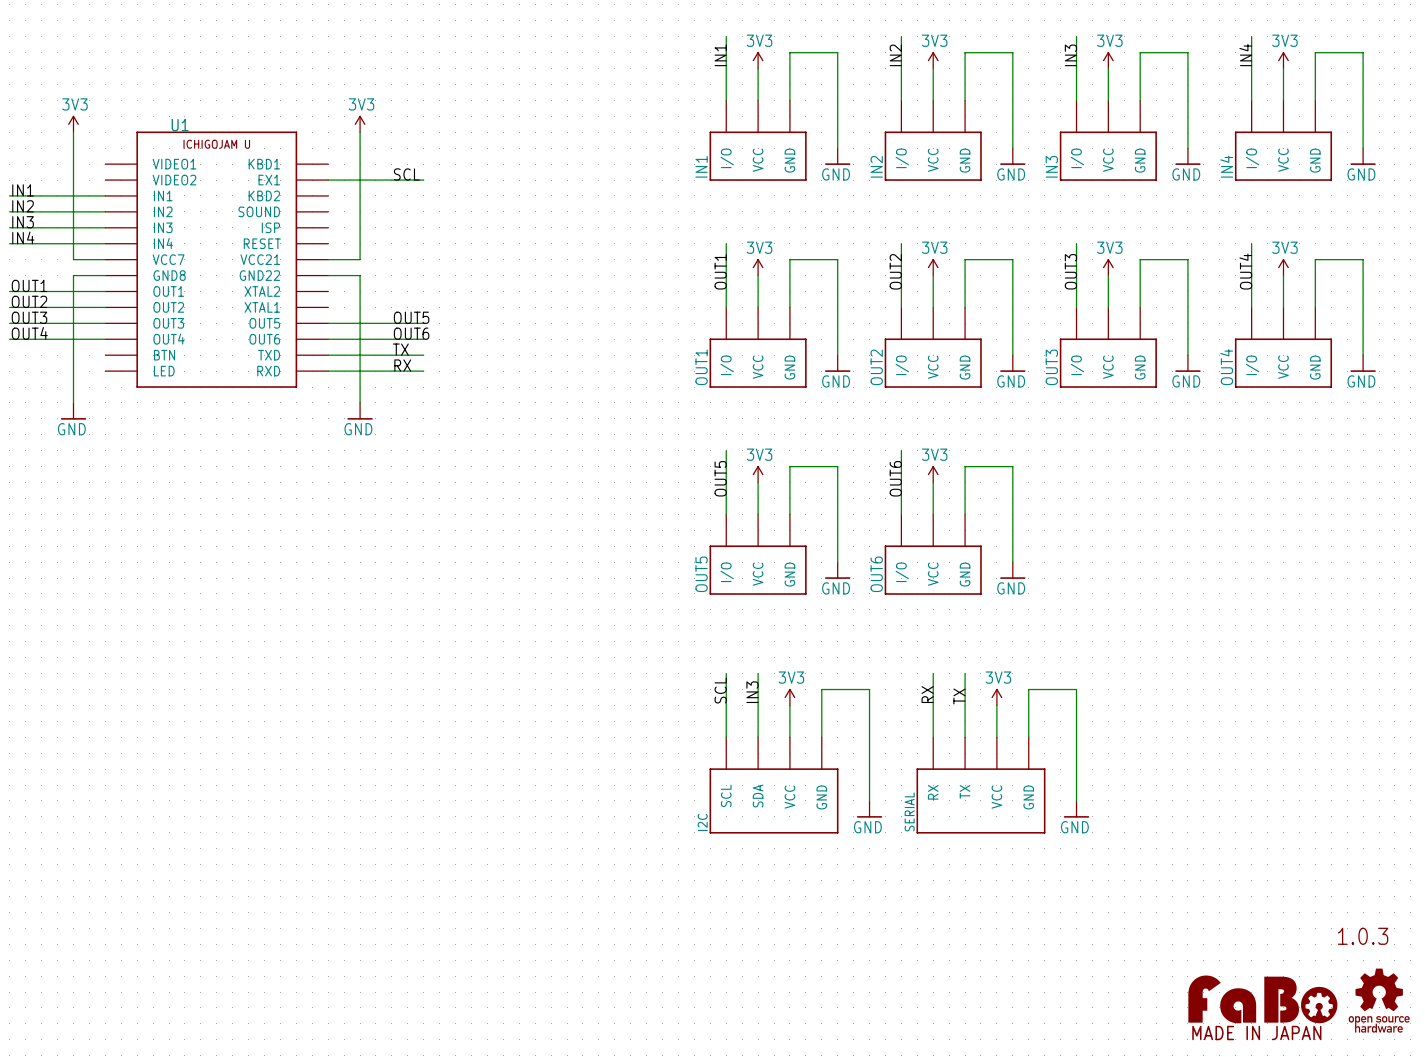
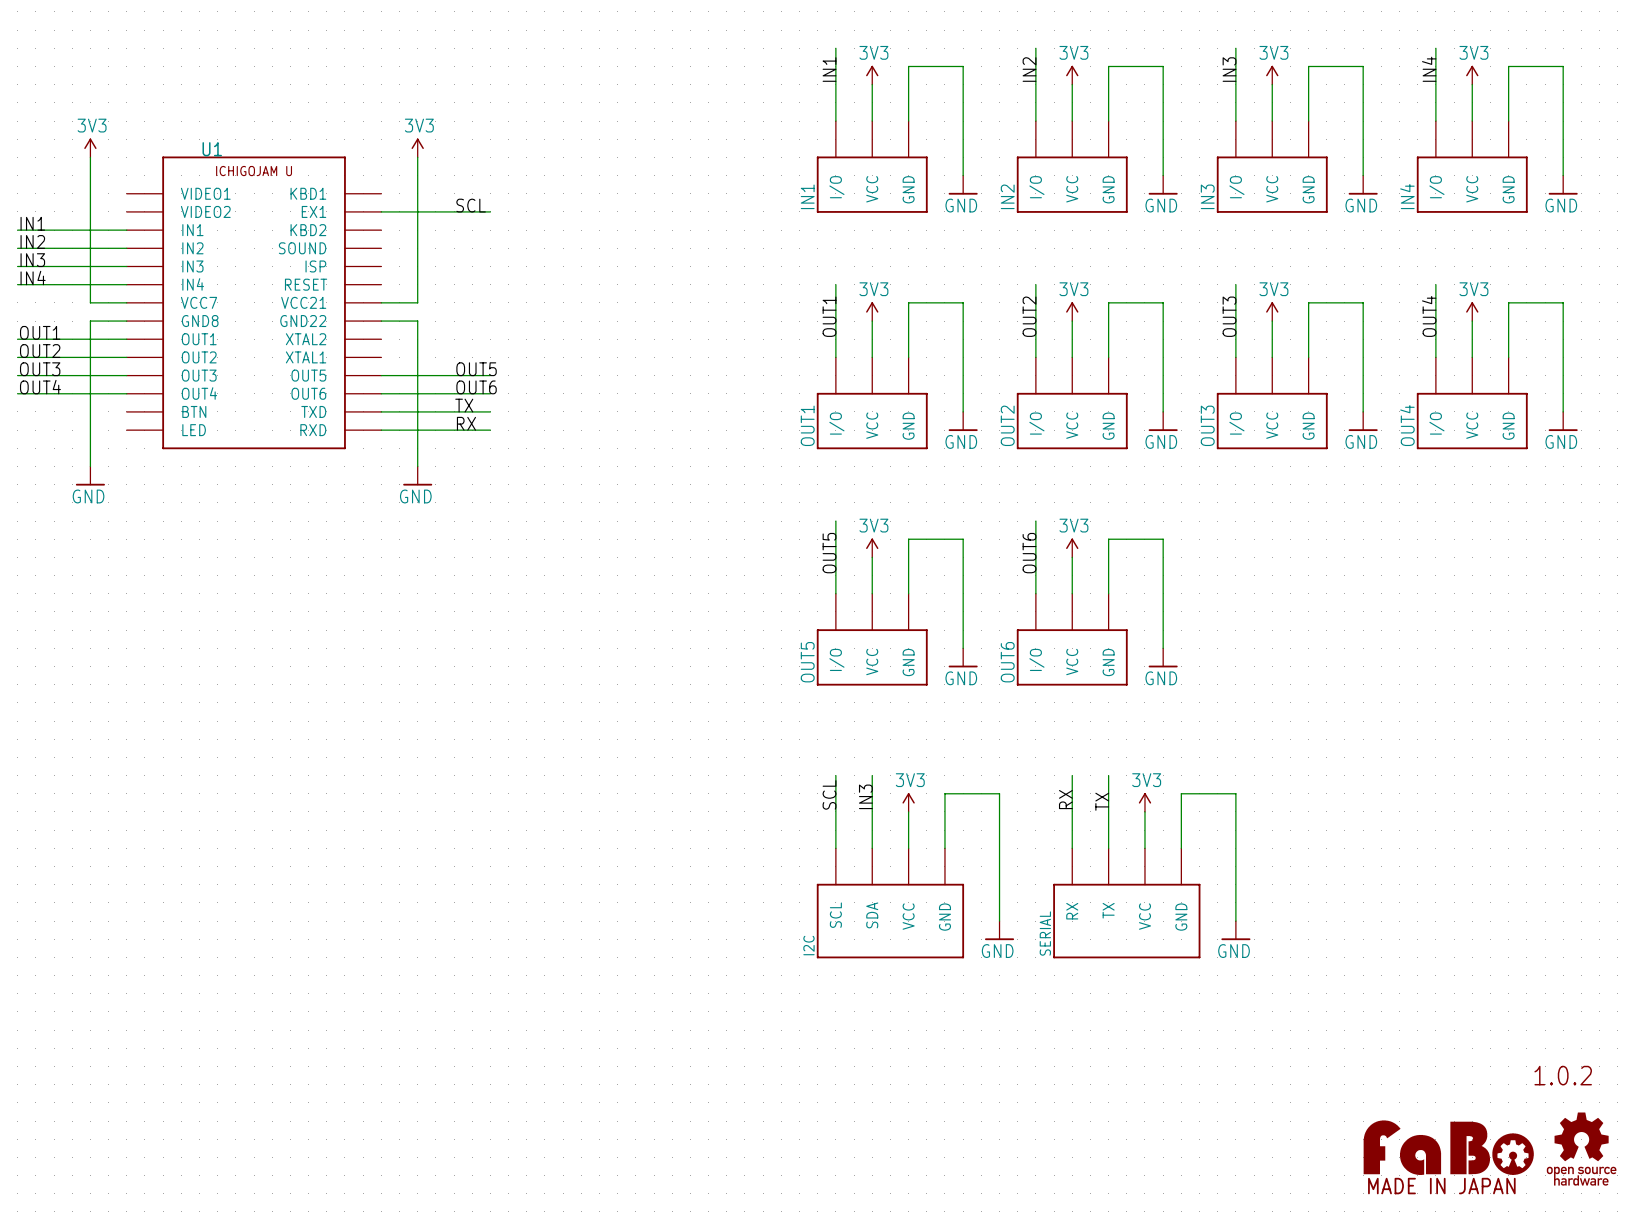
text: 1.0.3 (1363, 936) -> 1.0.2 (1563, 1075)

